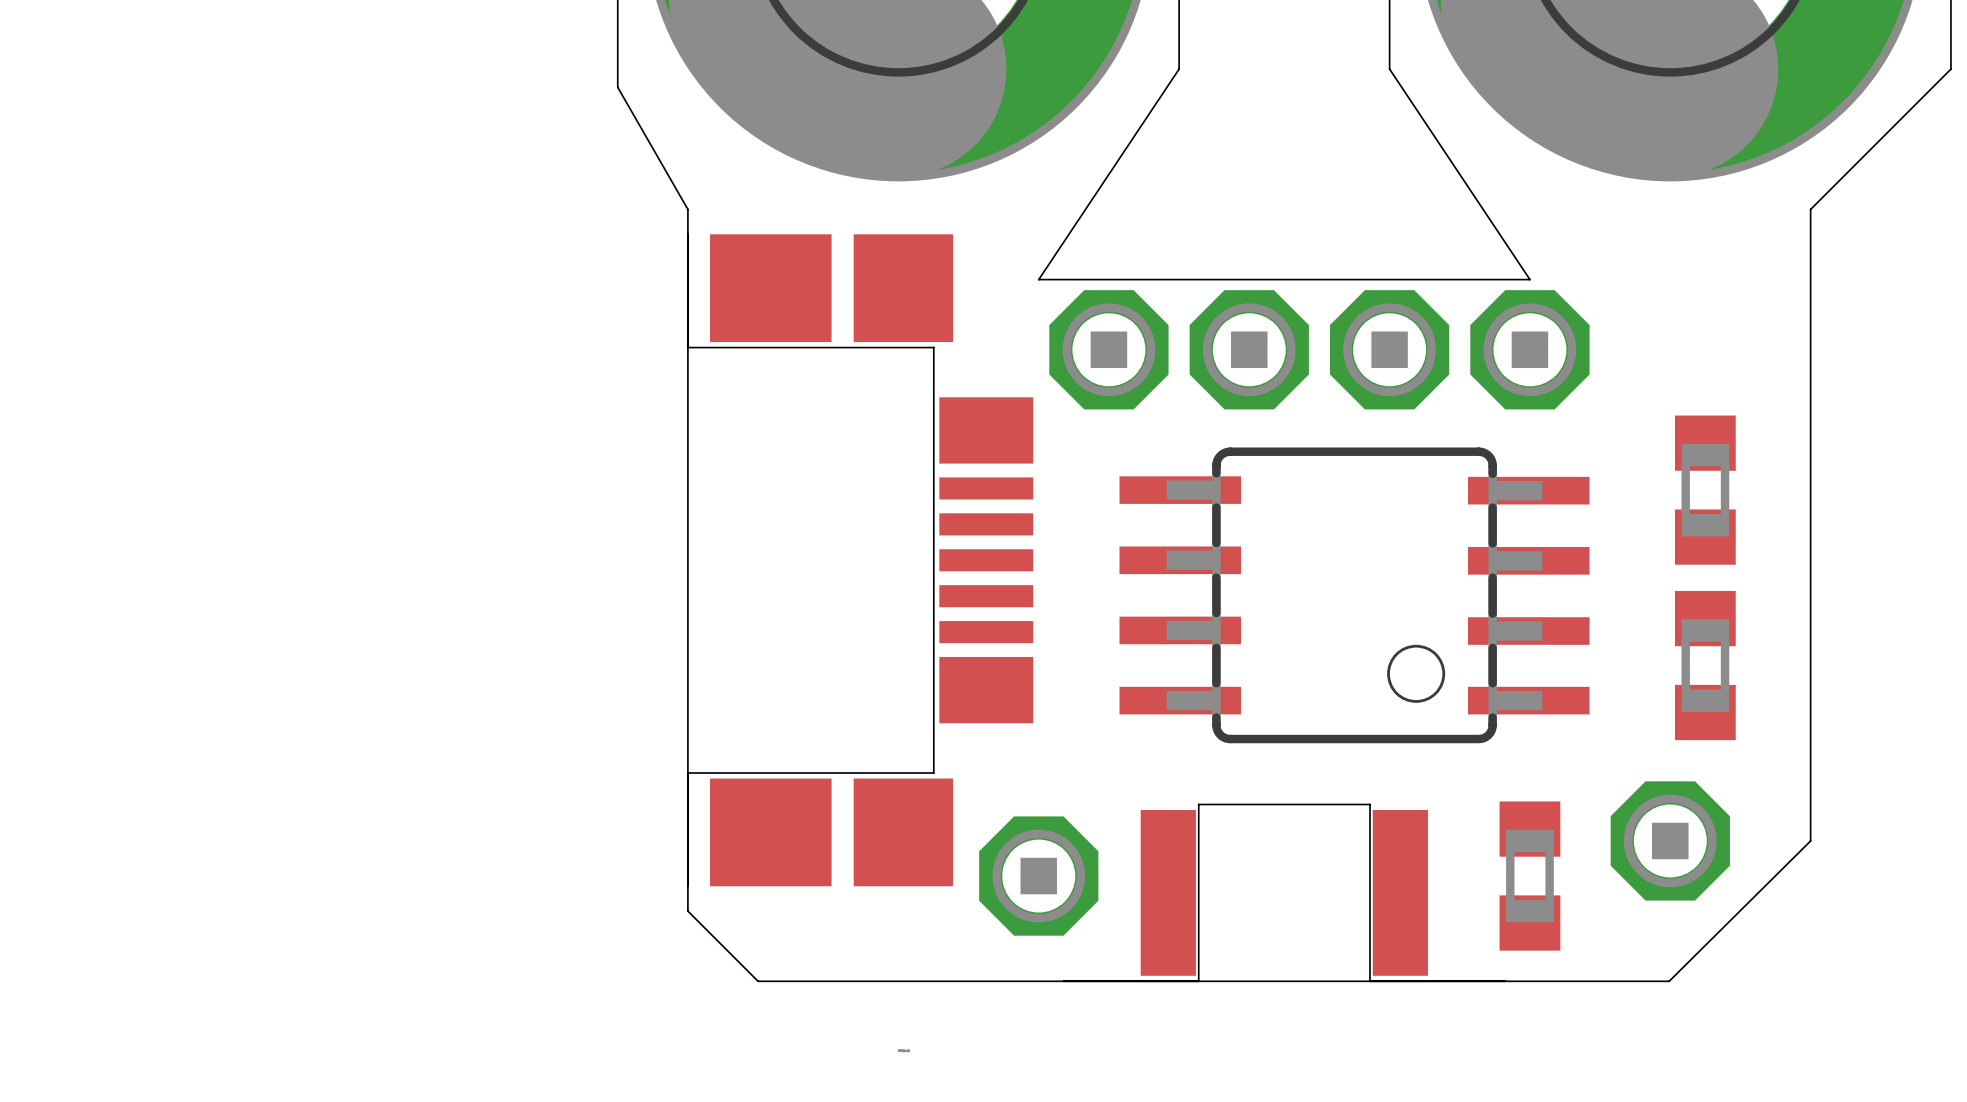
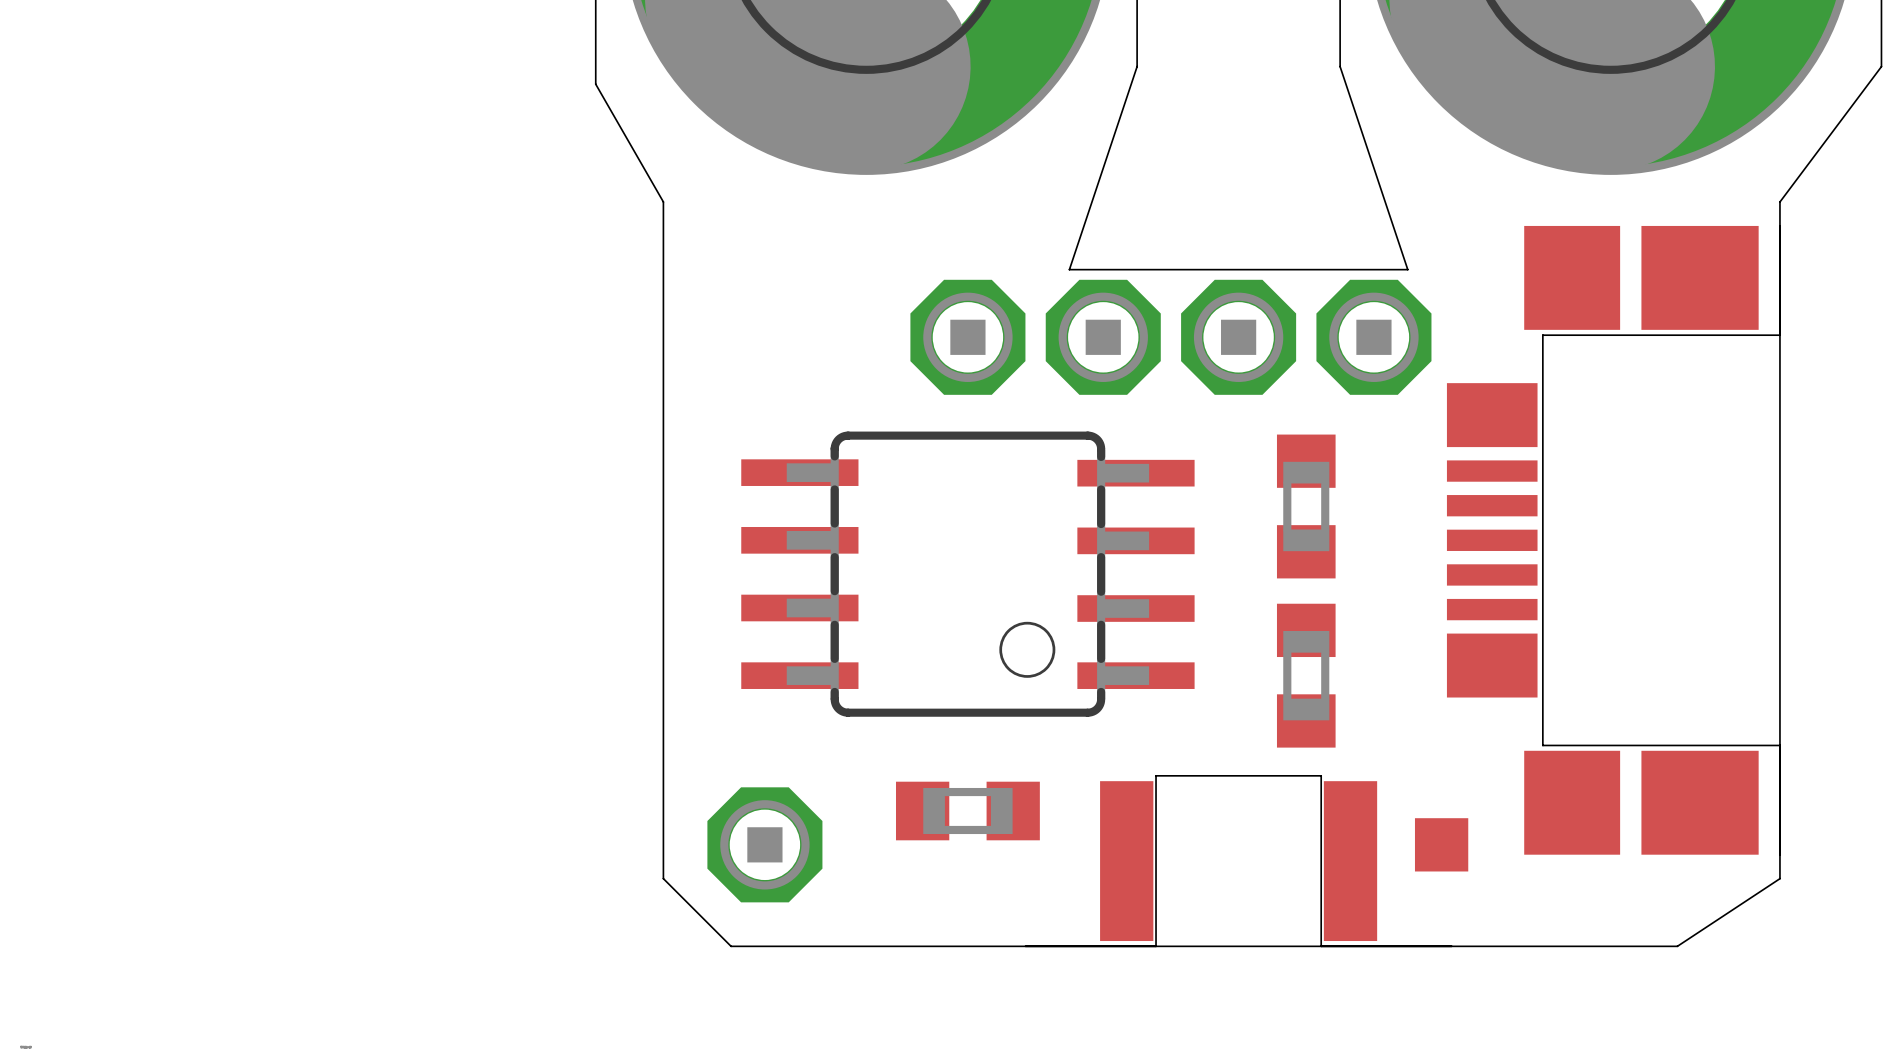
board edge: (1179, 69) (1038, 279) (1108, 279) -> (1137, 66) (1069, 269)
board edge: (1389, 69) (1529, 279) (1459, 279) -> (1340, 66) (1407, 269)
board edge: (1950, 69) (1810, 209) (1810, 840) (1669, 981) -> (1881, 66) (1779, 201) (1779, 878) (1677, 946) (1609, 946)
part position: (1108, 349) -> (1103, 337)
part position: (1249, 349) -> (1238, 337)
part position: (1389, 349) -> (1373, 337)
part position: (1529, 349) -> (967, 337)
part: (1705, 490) -> none
part: none -> (1306, 506)
part rotation: 0° (860, 560) -> 180° (1613, 540)
part position: (860, 560) -> (1613, 540)
part position: (1354, 595) -> (967, 574)
part: (1705, 665) -> none
part: none -> (1306, 675)
part footprint: [1499, 801, 1561, 951] -> [1414, 818, 1469, 872]
part footprint: [979, 816, 1099, 936] -> [895, 781, 1040, 841]
part position: (1670, 840) -> (764, 844)

